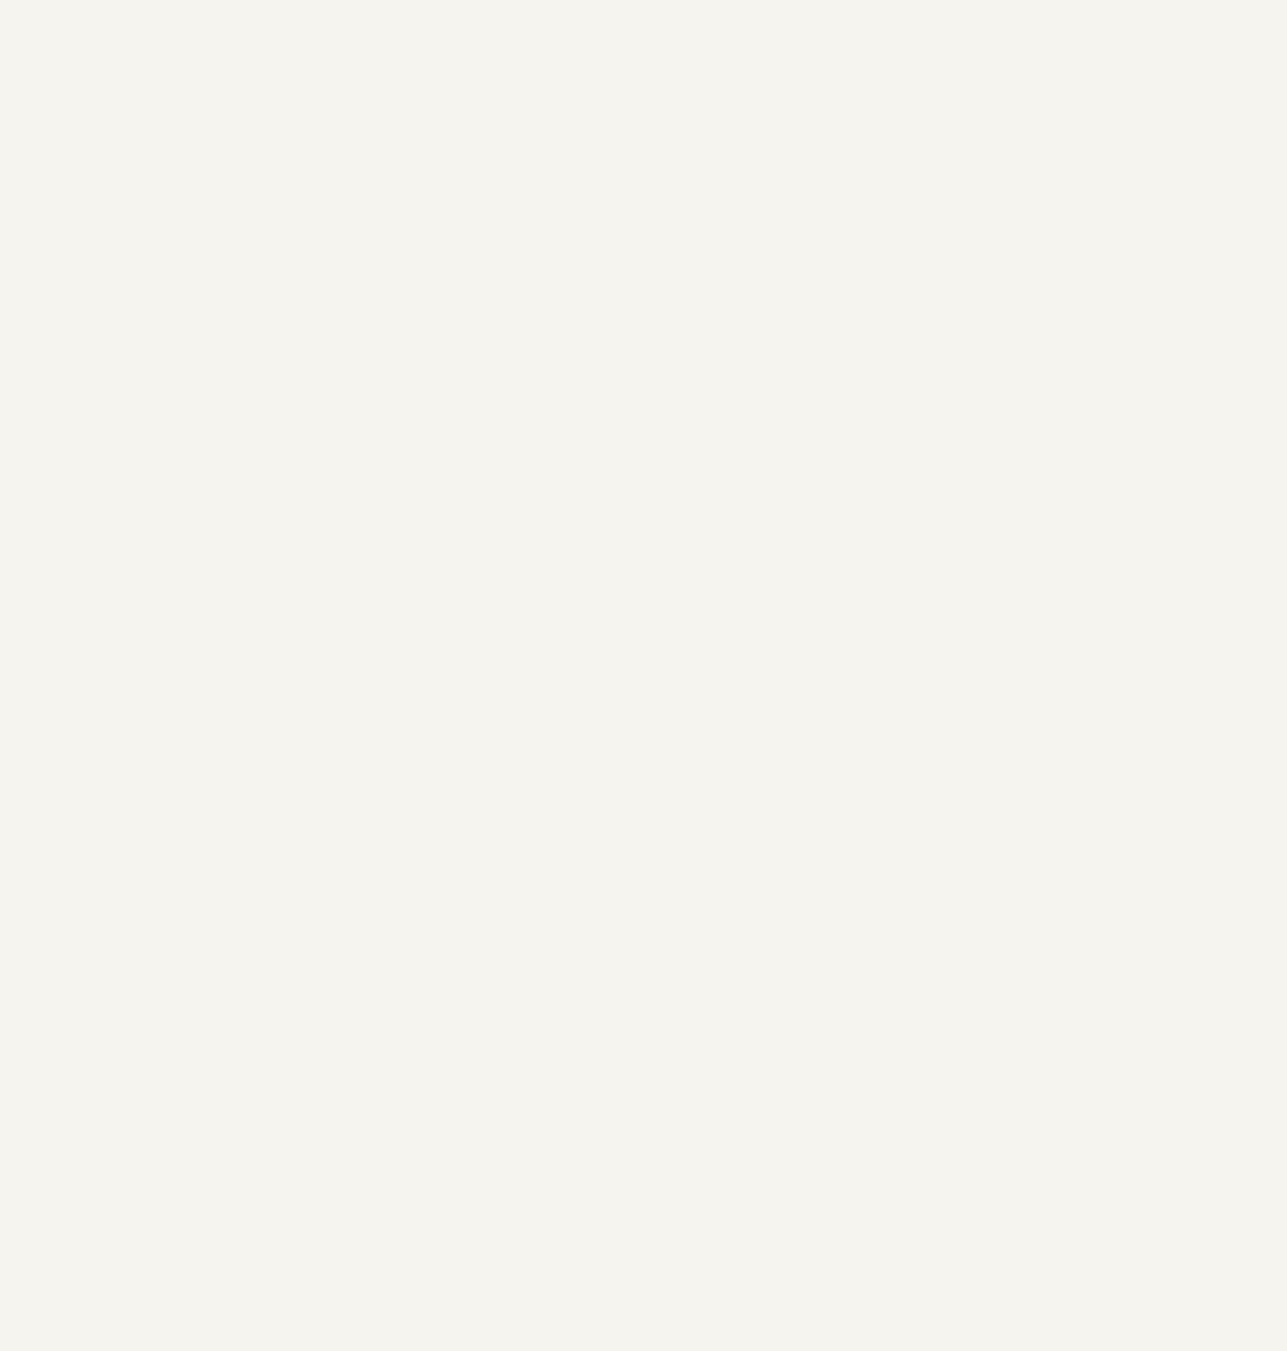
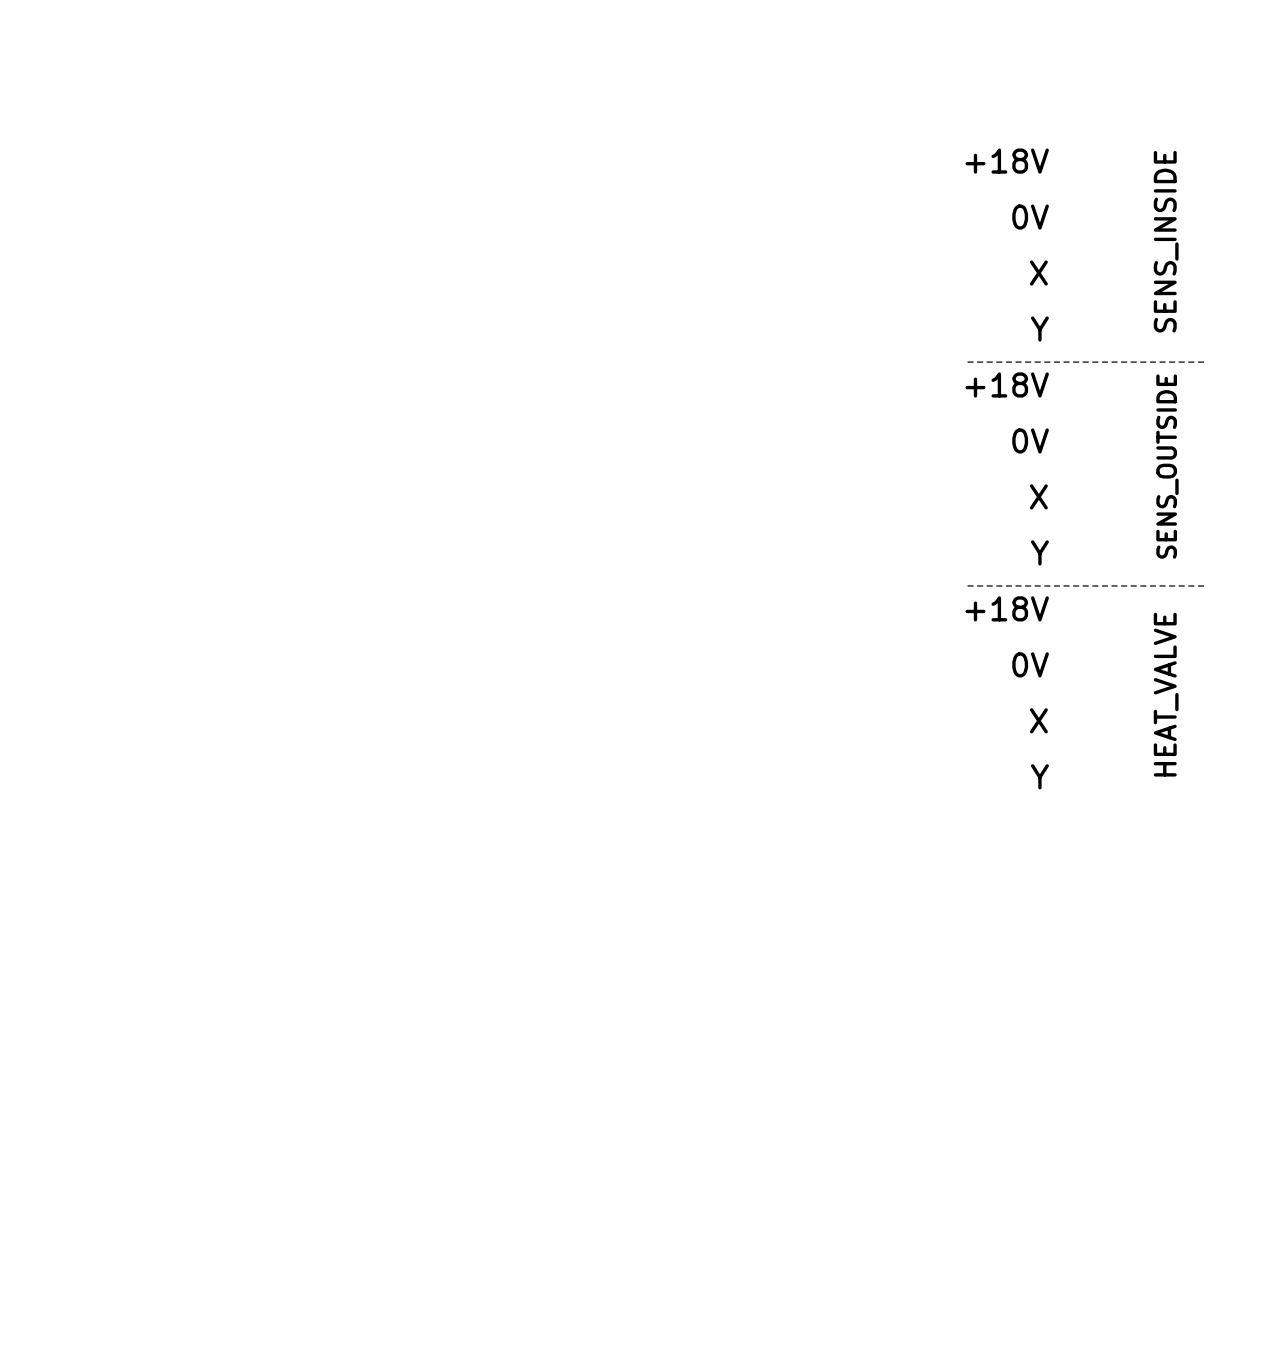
text: none -> +18V (1007, 161)
text: none -> 0V (1030, 217)
text: none -> SENS_INSIDE (1166, 241)
text: none -> X (1038, 273)
text: none -> Y (1039, 329)
line: none -> (967, 362) (1205, 362)
text: none -> +18V (1007, 384)
text: none -> 0V (1030, 440)
text: none -> SENS_OUTSIDE (1167, 466)
text: none -> X (1038, 496)
text: none -> Y (1039, 552)
line: none -> (967, 585) (1205, 585)
text: none -> +18V (1007, 608)
text: none -> 0V (1030, 664)
text: none -> HEAT_VALVE (1166, 694)
text: none -> X (1038, 720)
text: none -> Y (1039, 776)

